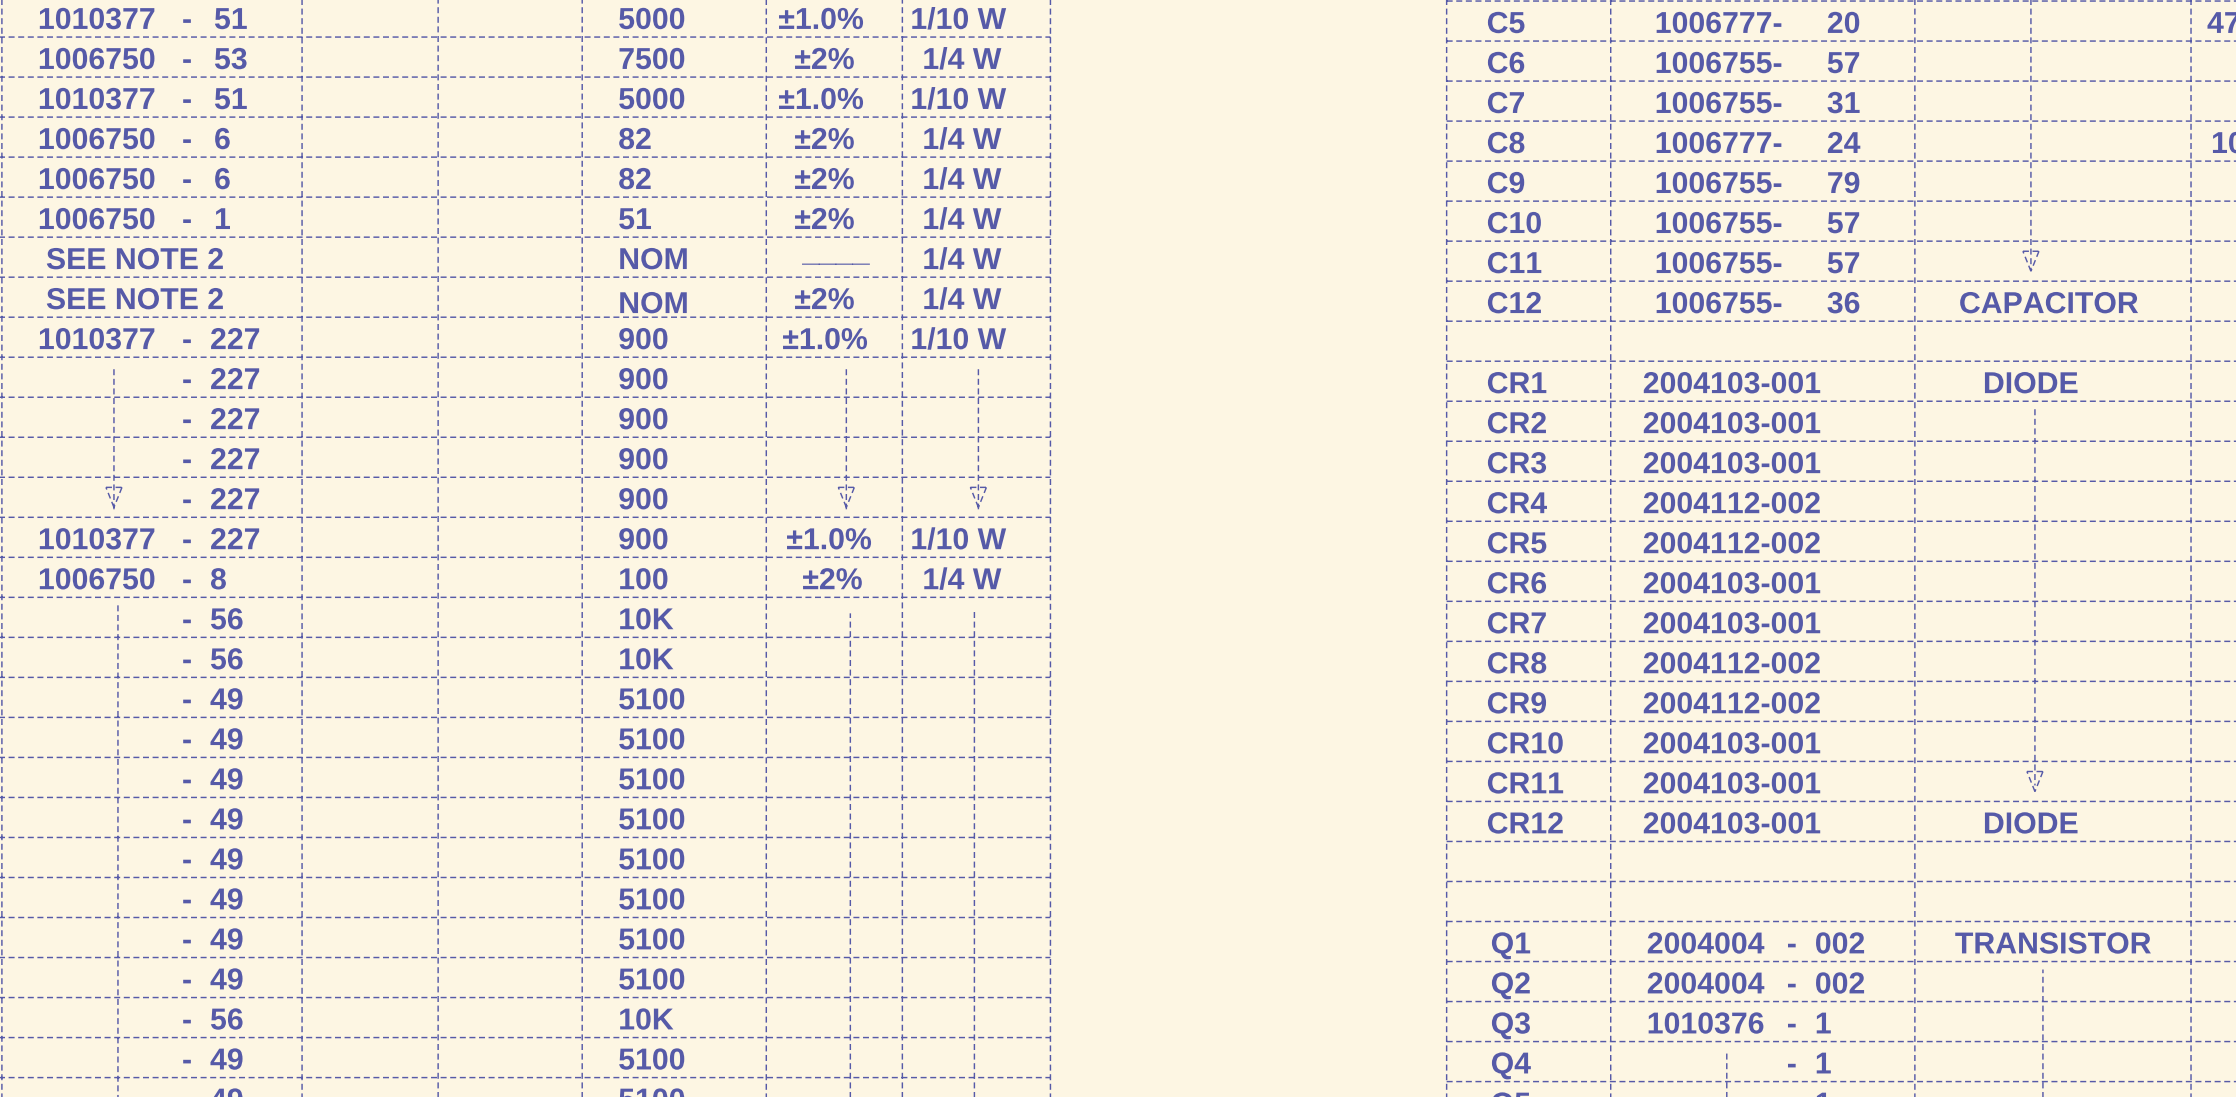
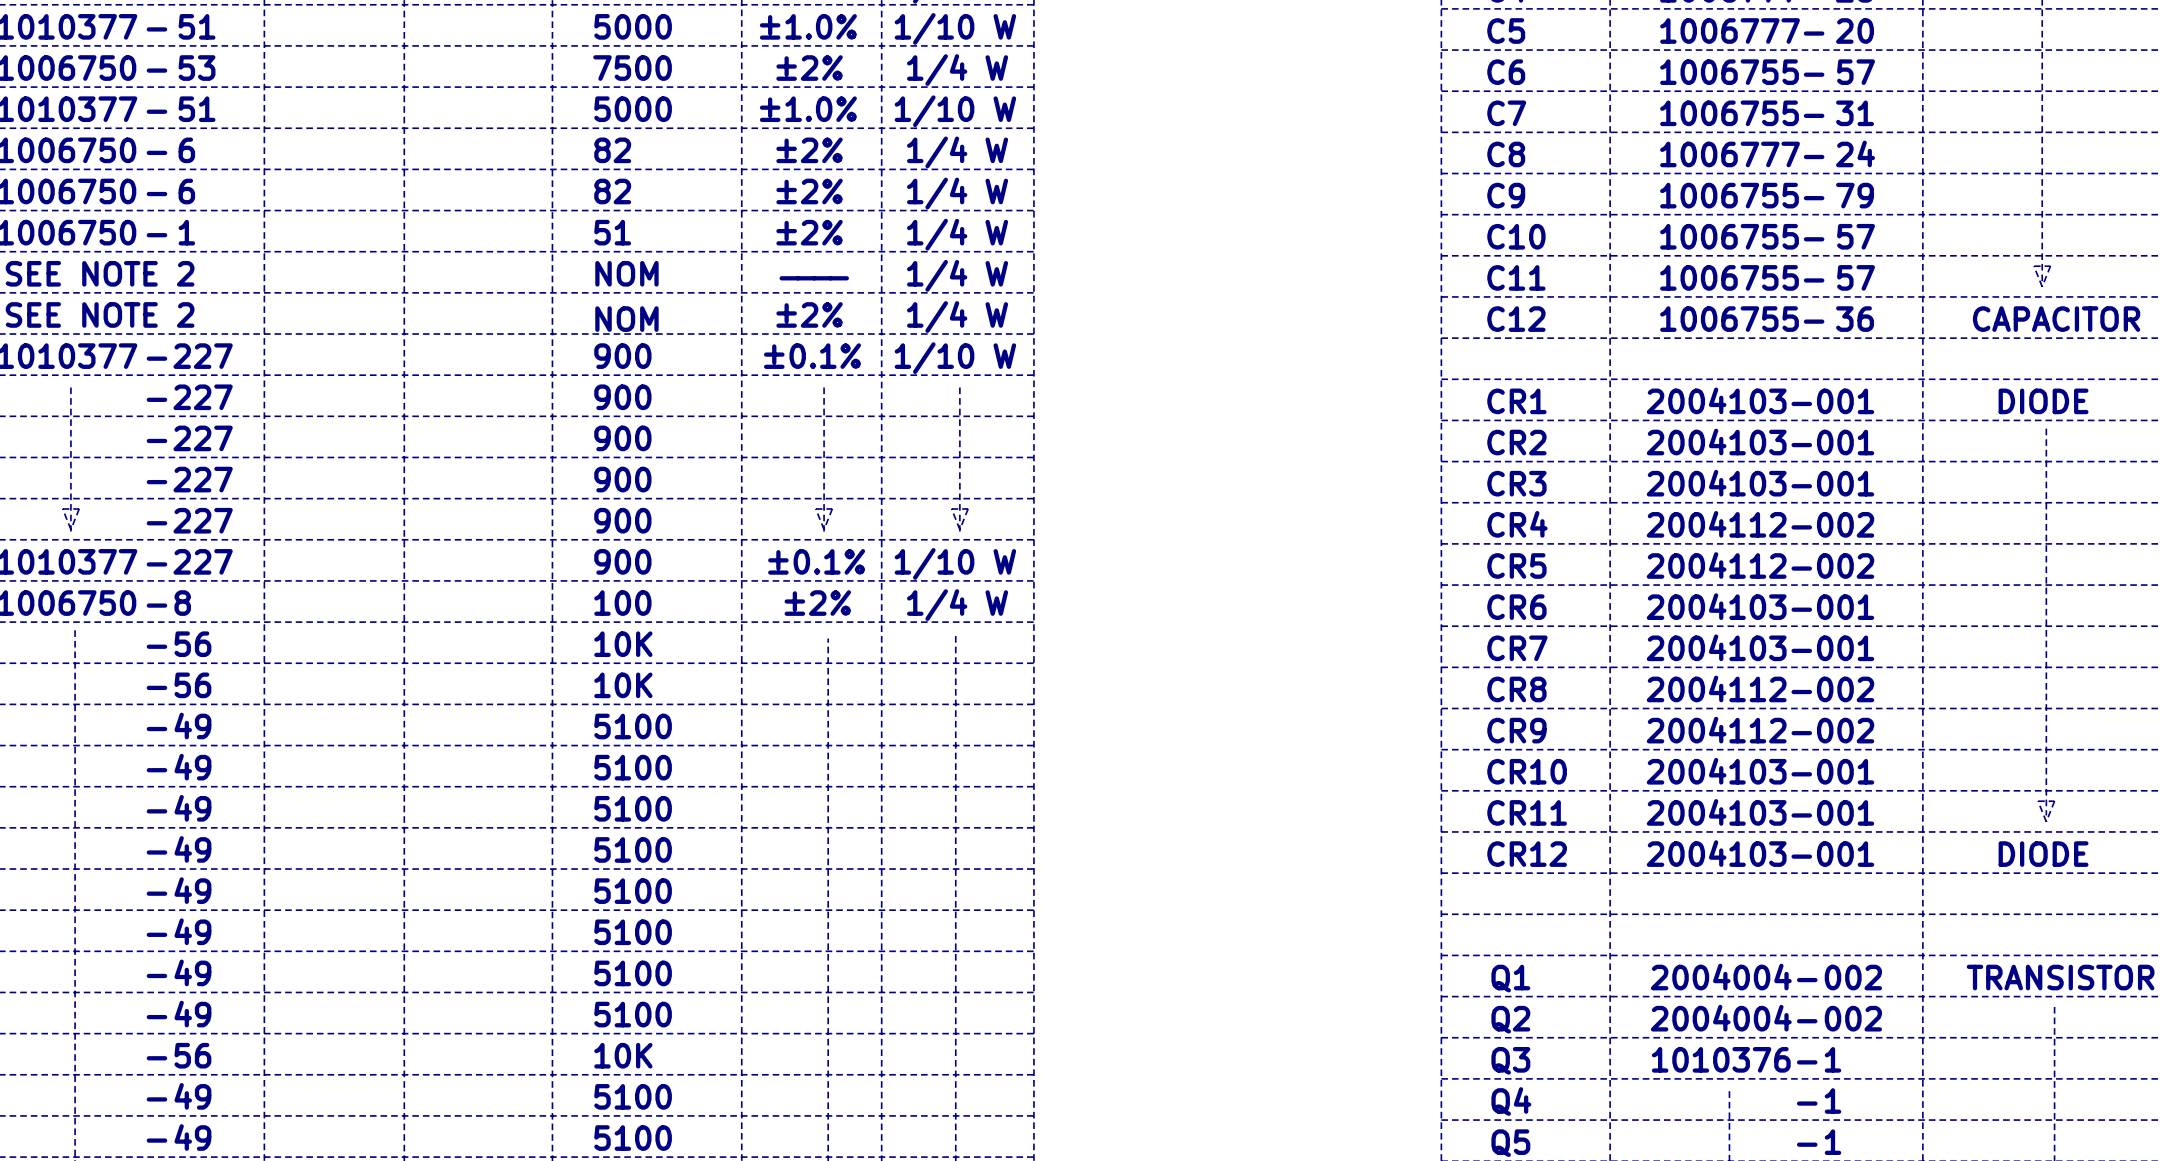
text: ±1.0% (825, 338) -> ±0.1% (812, 356)
text: ±1.0% (829, 538) -> ±0.1% (816, 561)

